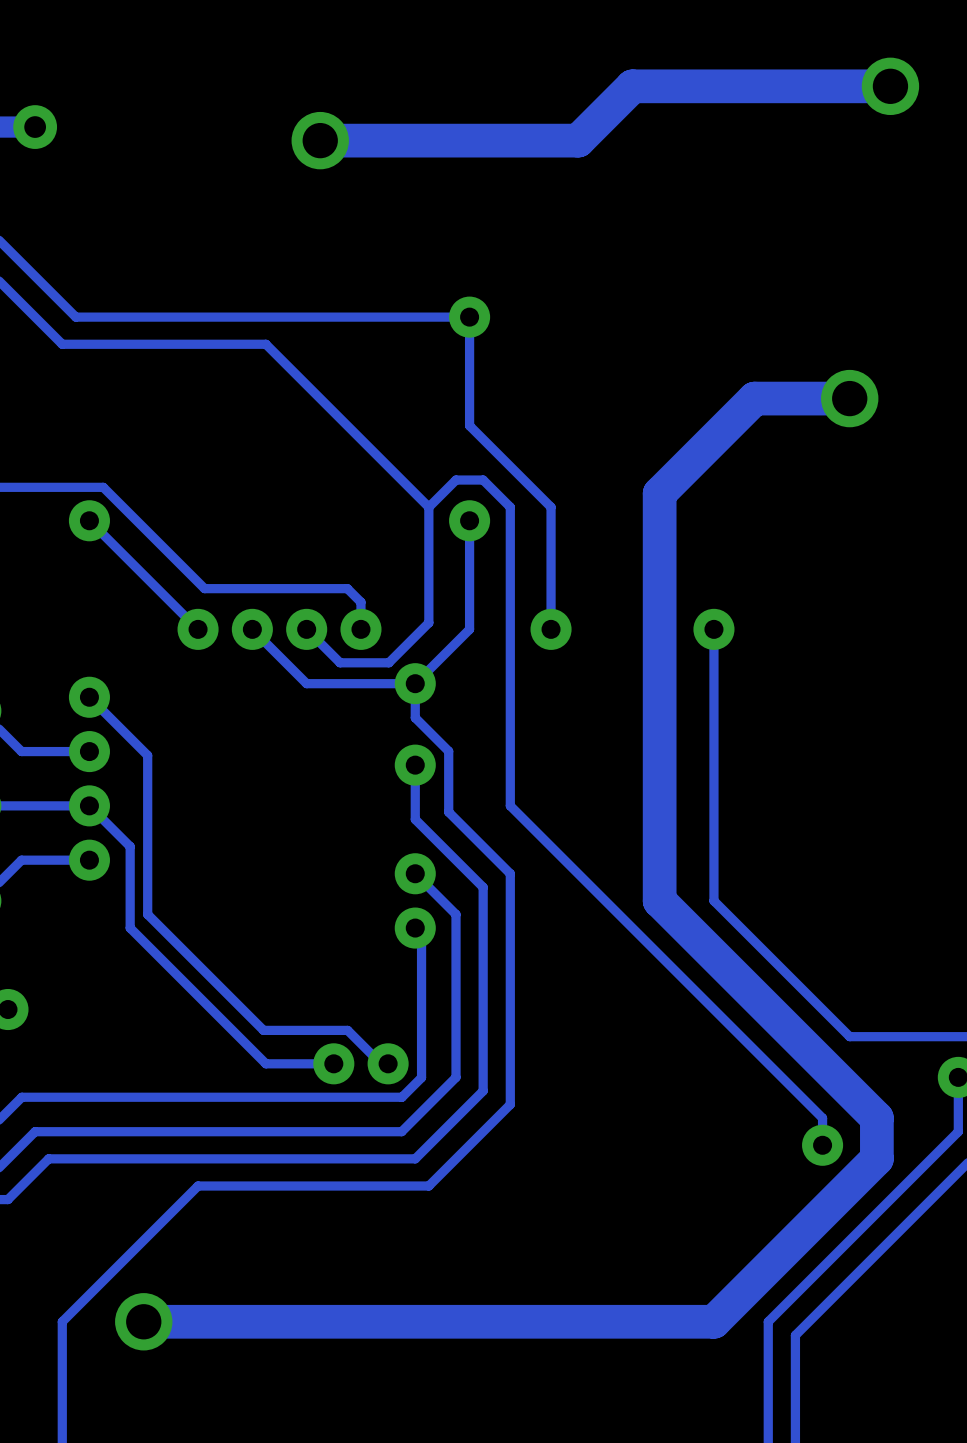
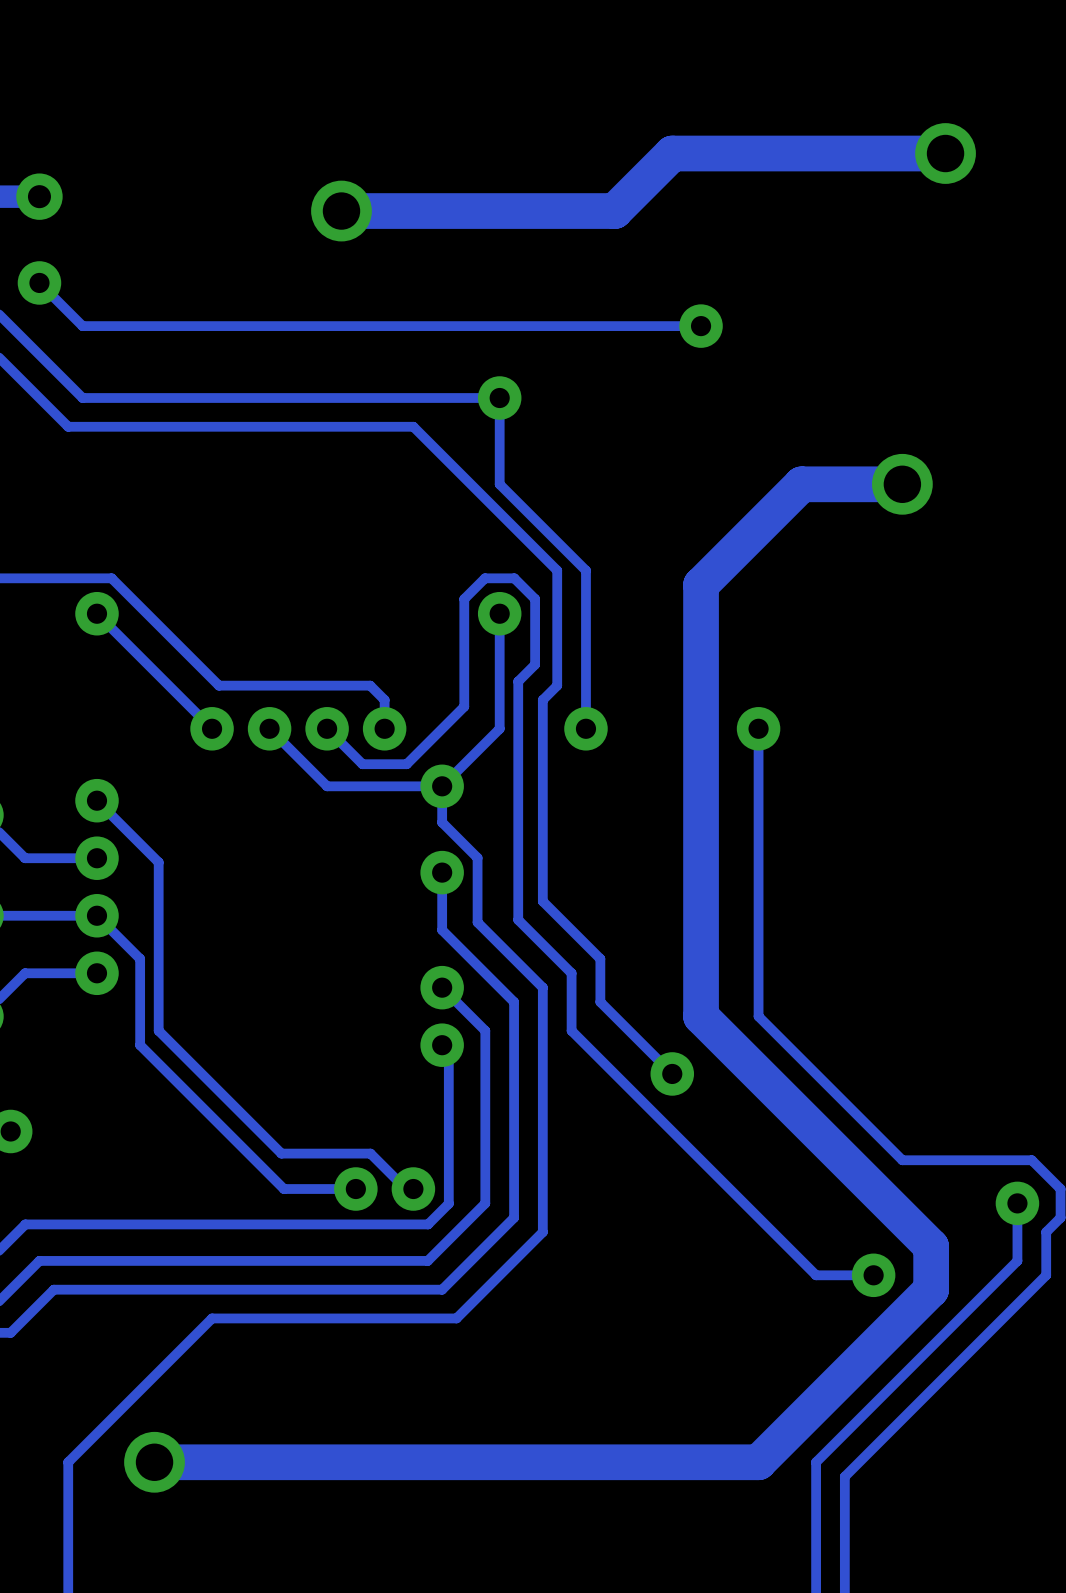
track: none -> (39, 282) (82, 326) (701, 326)
via: none -> (39, 282)
via: none -> (701, 326)
track: (265, 344) (428, 507) -> (283, 426) (413, 426) (499, 513)
track: (469, 398) (469, 425) -> none
track: (523, 480) (551, 507) -> (499, 484) (585, 570) (585, 599)
track: (428, 507) (456, 480) (483, 480) (510, 507) (510, 602) -> (557, 570) (557, 685) (542, 700)
track: (428, 507) (428, 622) (388, 662) (381, 662) -> none
track: (510, 792) (510, 805) (822, 1118) (822, 1145) -> (406, 764) (464, 706) (464, 599) (485, 578) (514, 578) (535, 599) (535, 664) (518, 681) (518, 919) (571, 973) (571, 1030) (816, 1275) (873, 1275)
track: none -> (542, 901) (600, 958) (600, 1002) (672, 1073)
via: none -> (672, 1073)

